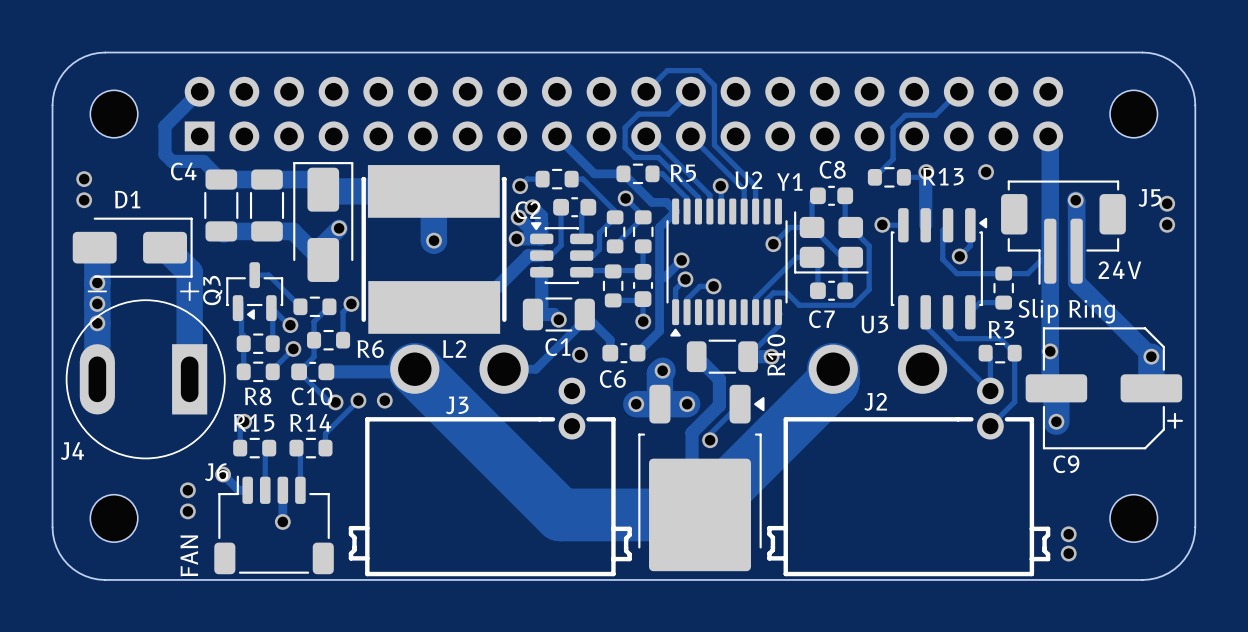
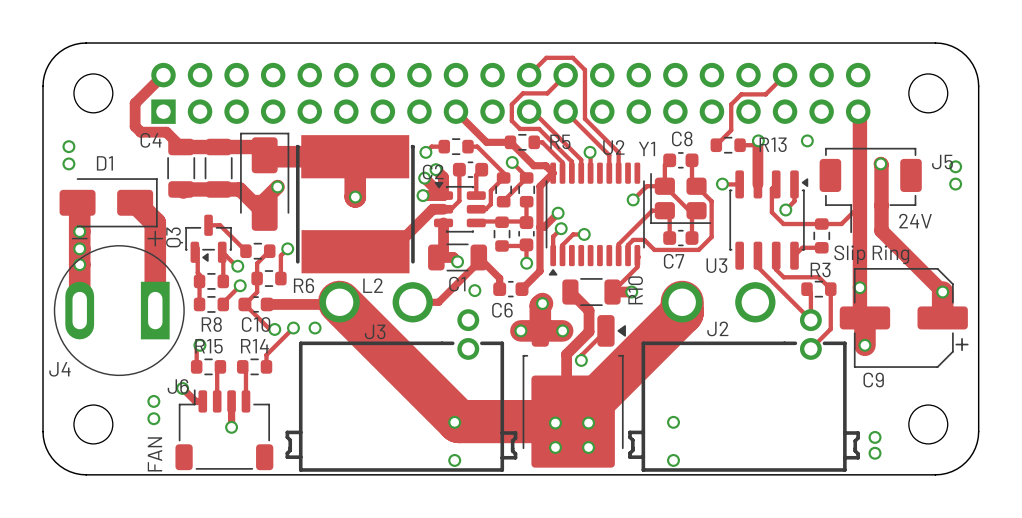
via: none -> (454, 422)
via: none -> (673, 422)
via: none -> (555, 423)
via: none -> (588, 423)
via: none -> (555, 447)
via: none -> (588, 447)
via: none -> (454, 460)
via: none -> (673, 460)

